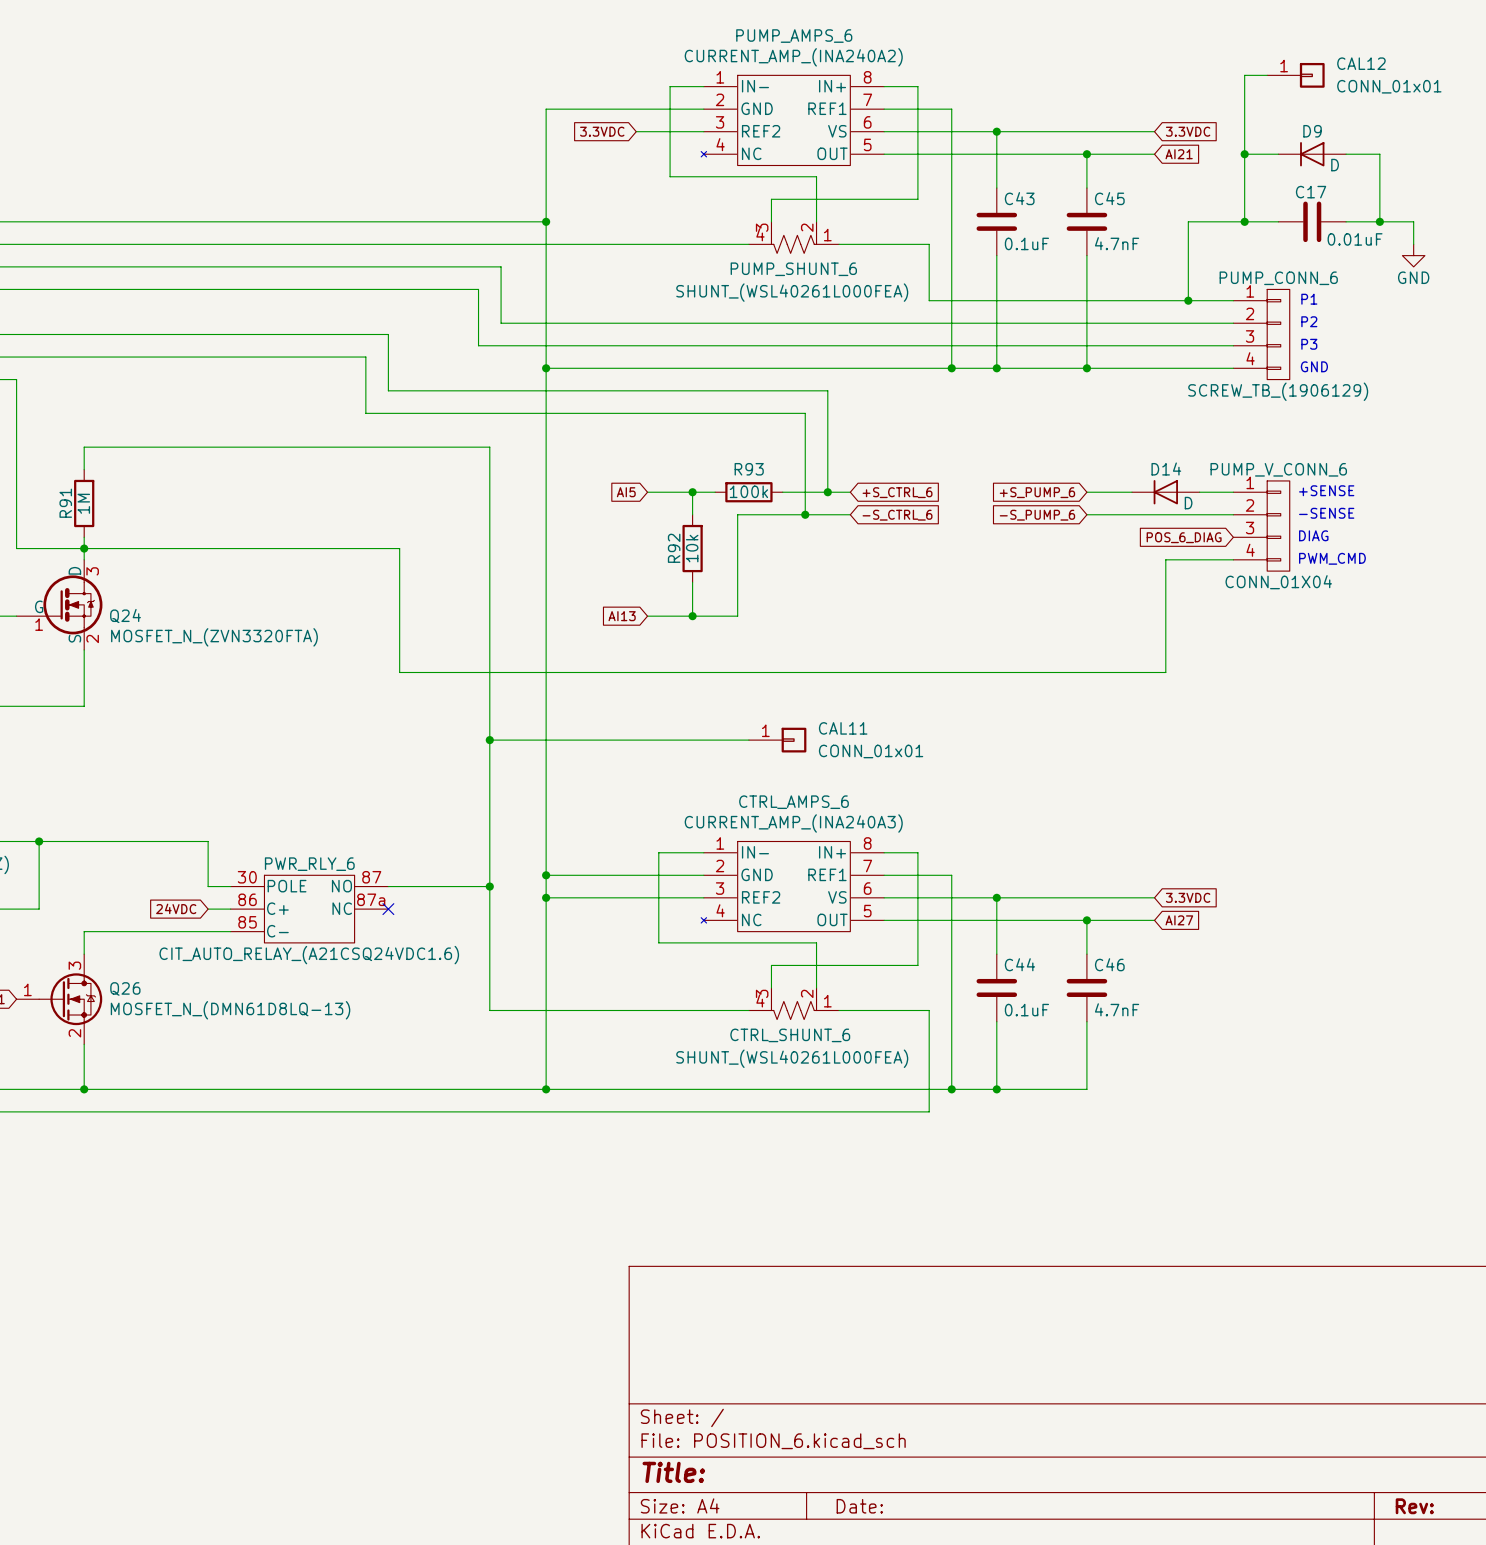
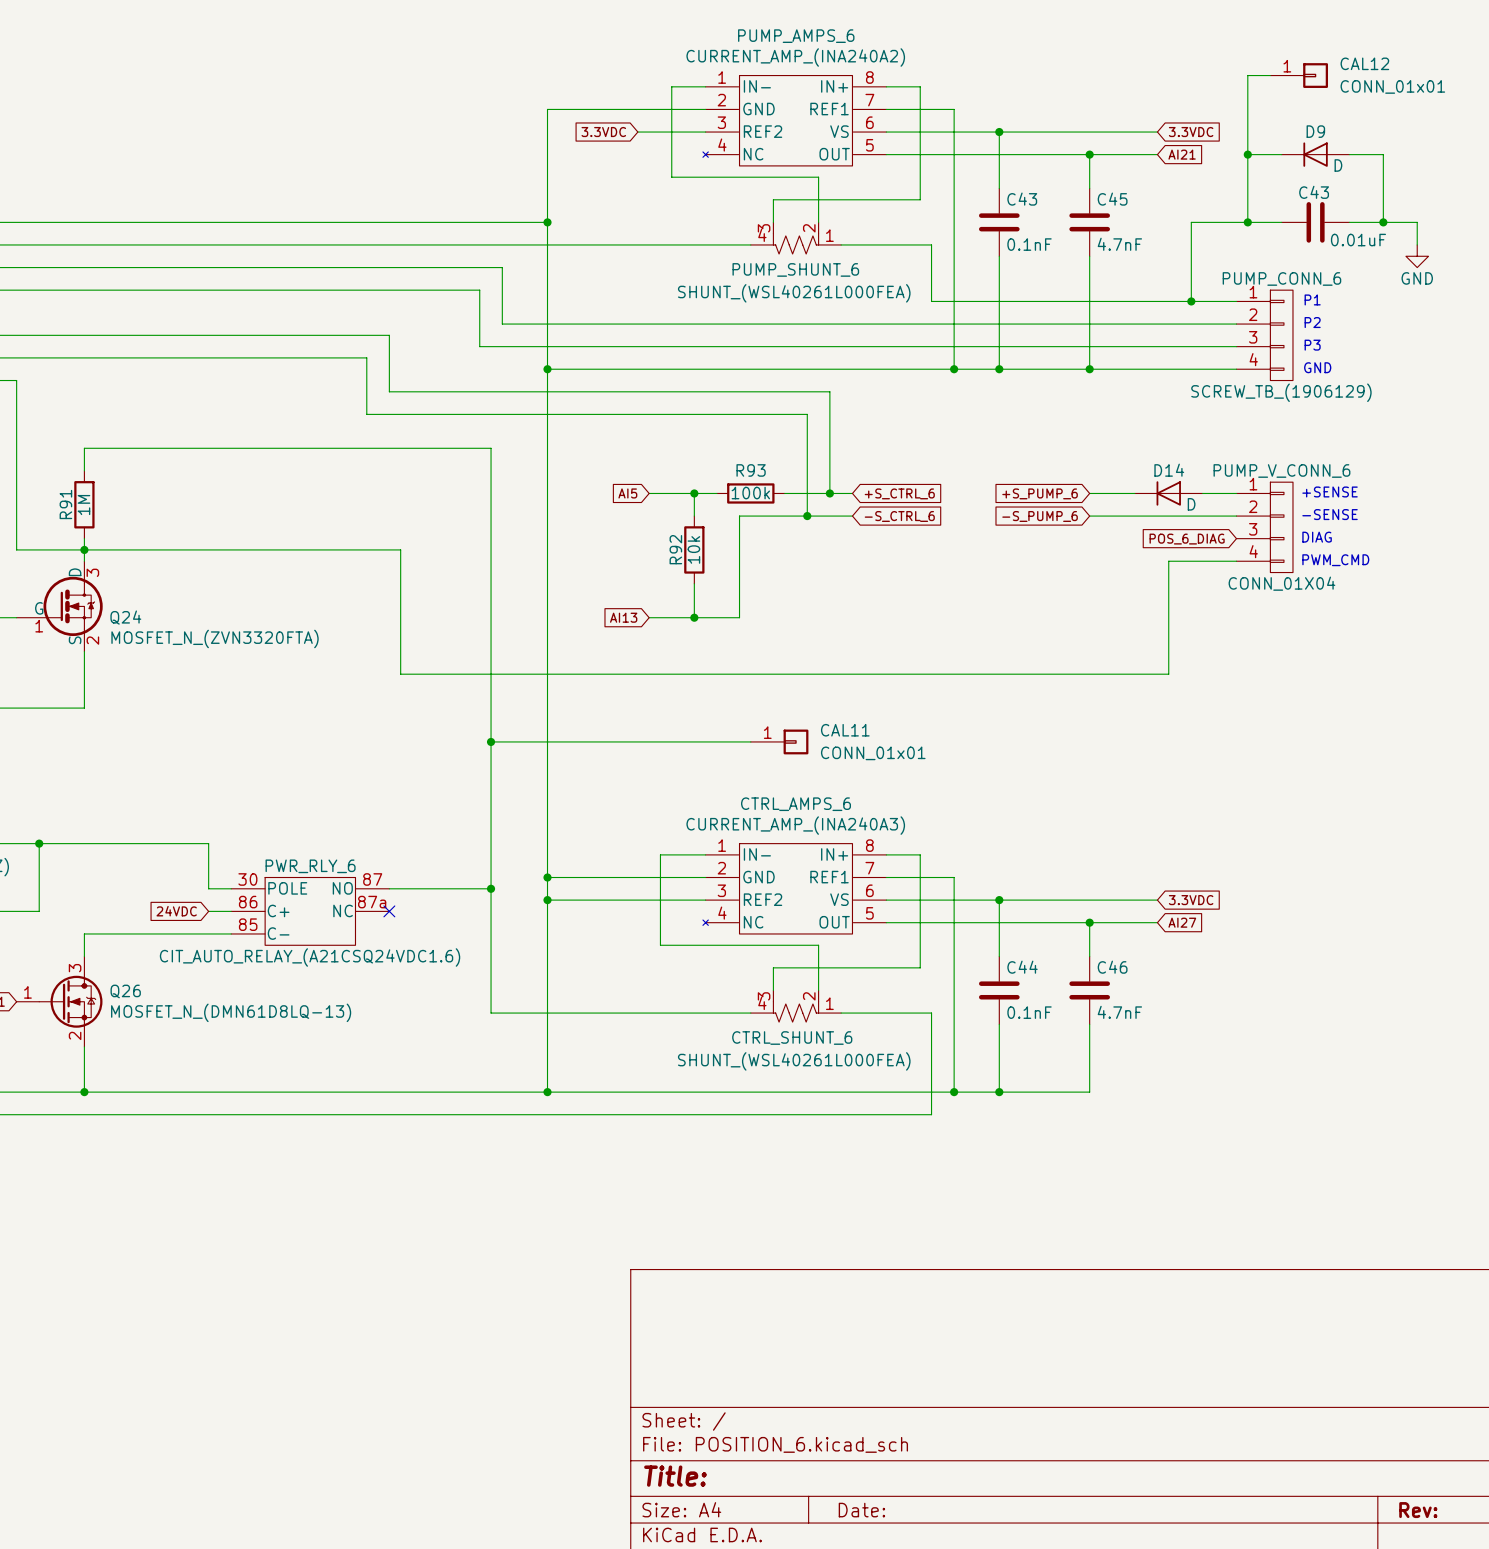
C17 name: C17 (1311, 192) -> C43 (1314, 192)
C43 value: 0.1uF (1026, 243) -> 0.1nF (1029, 244)
C44 value: 0.1uF (1026, 1010) -> 0.1nF (1029, 1012)

